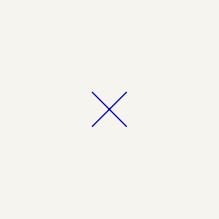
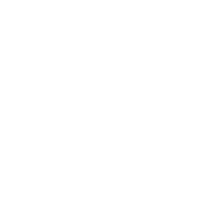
no-connect mark: (109, 109) -> none

